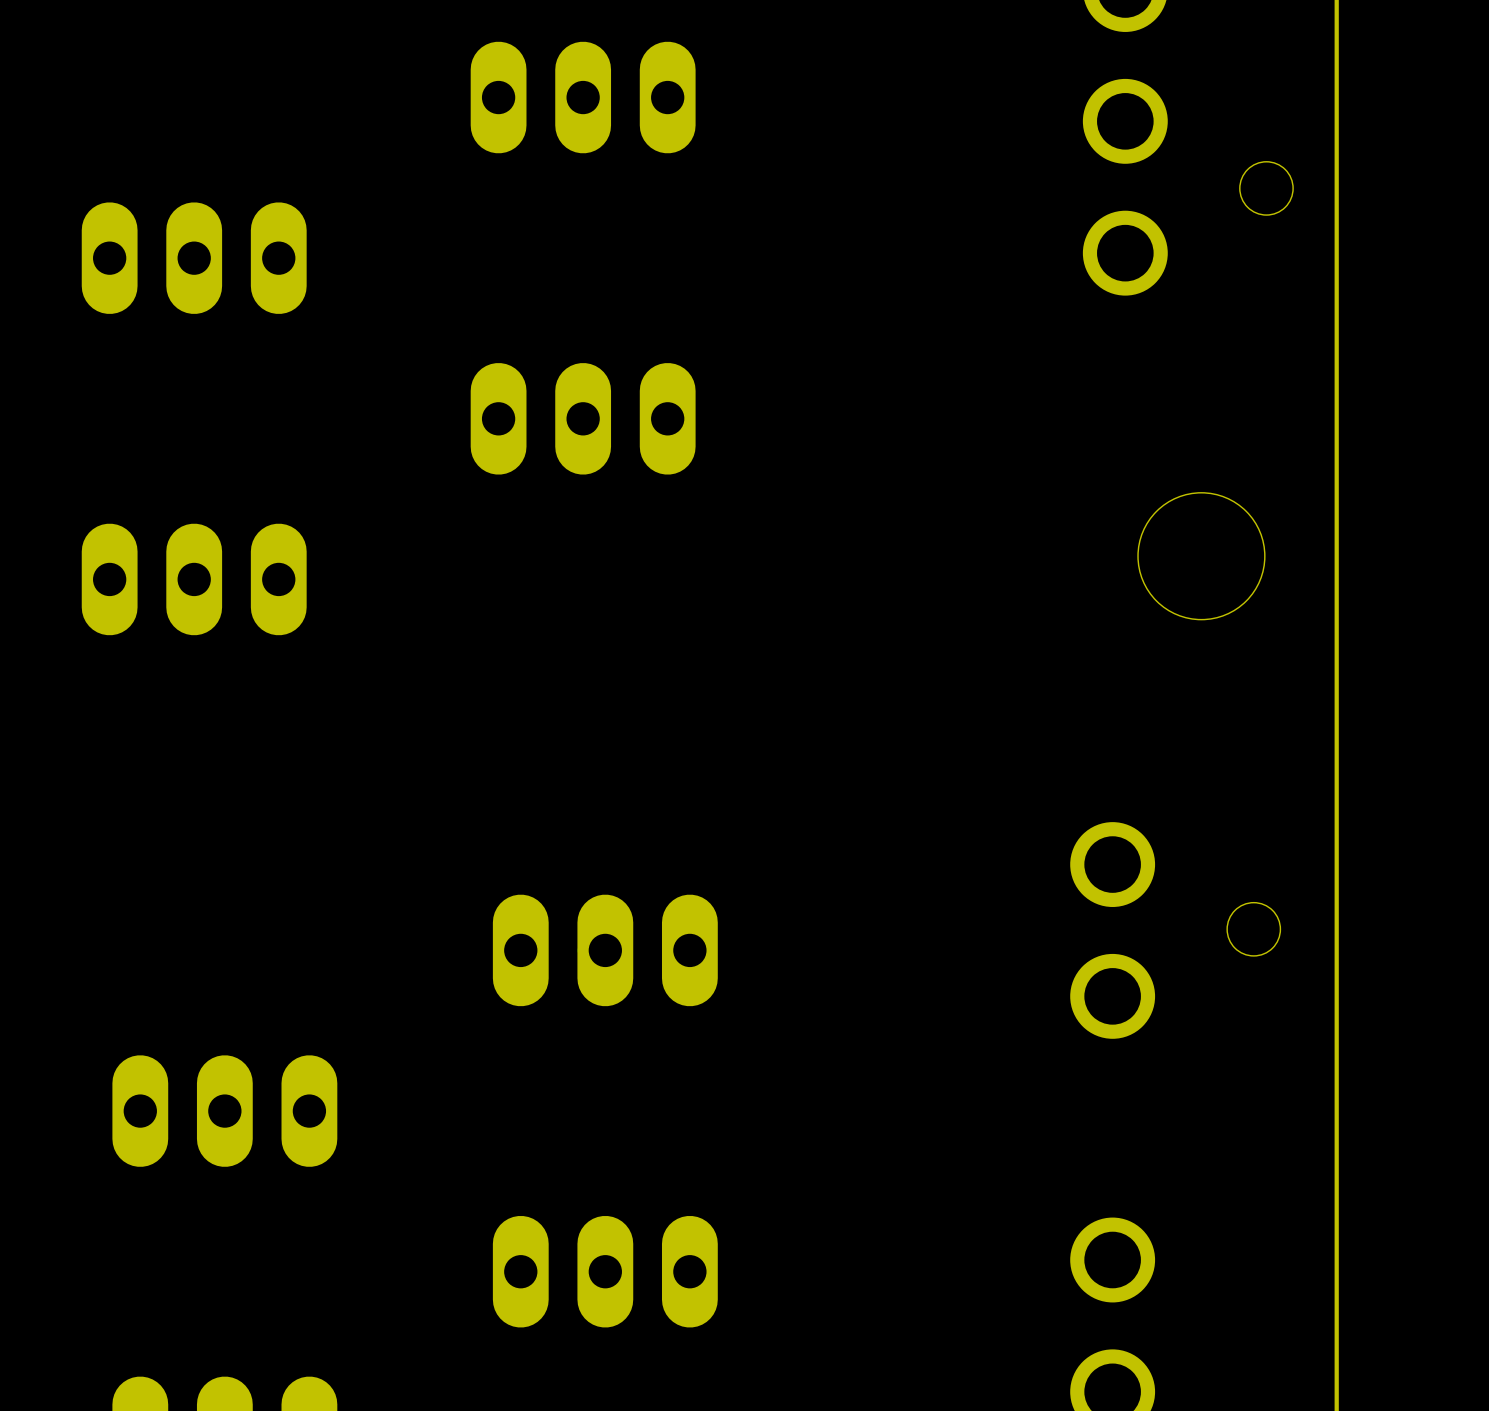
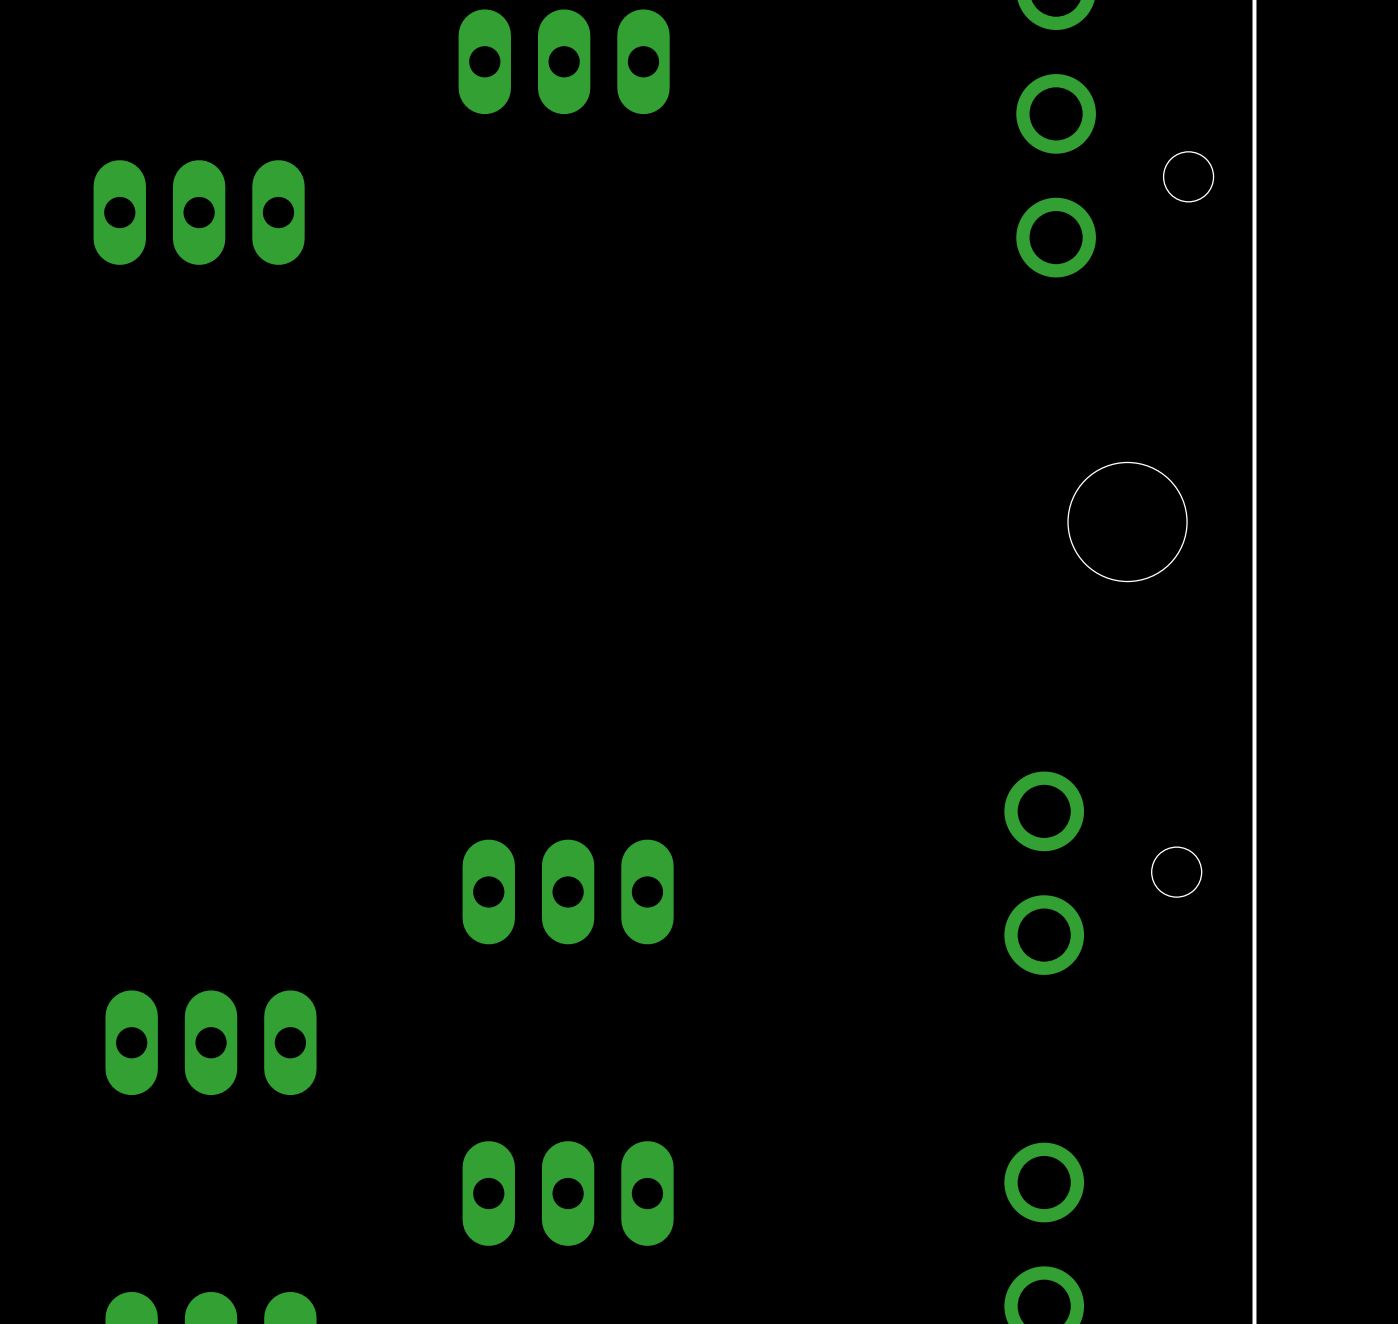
part position: (583, 97) -> (564, 61)
part position: (194, 258) -> (199, 212)
part: (583, 418) -> none
part: (194, 579) -> none

